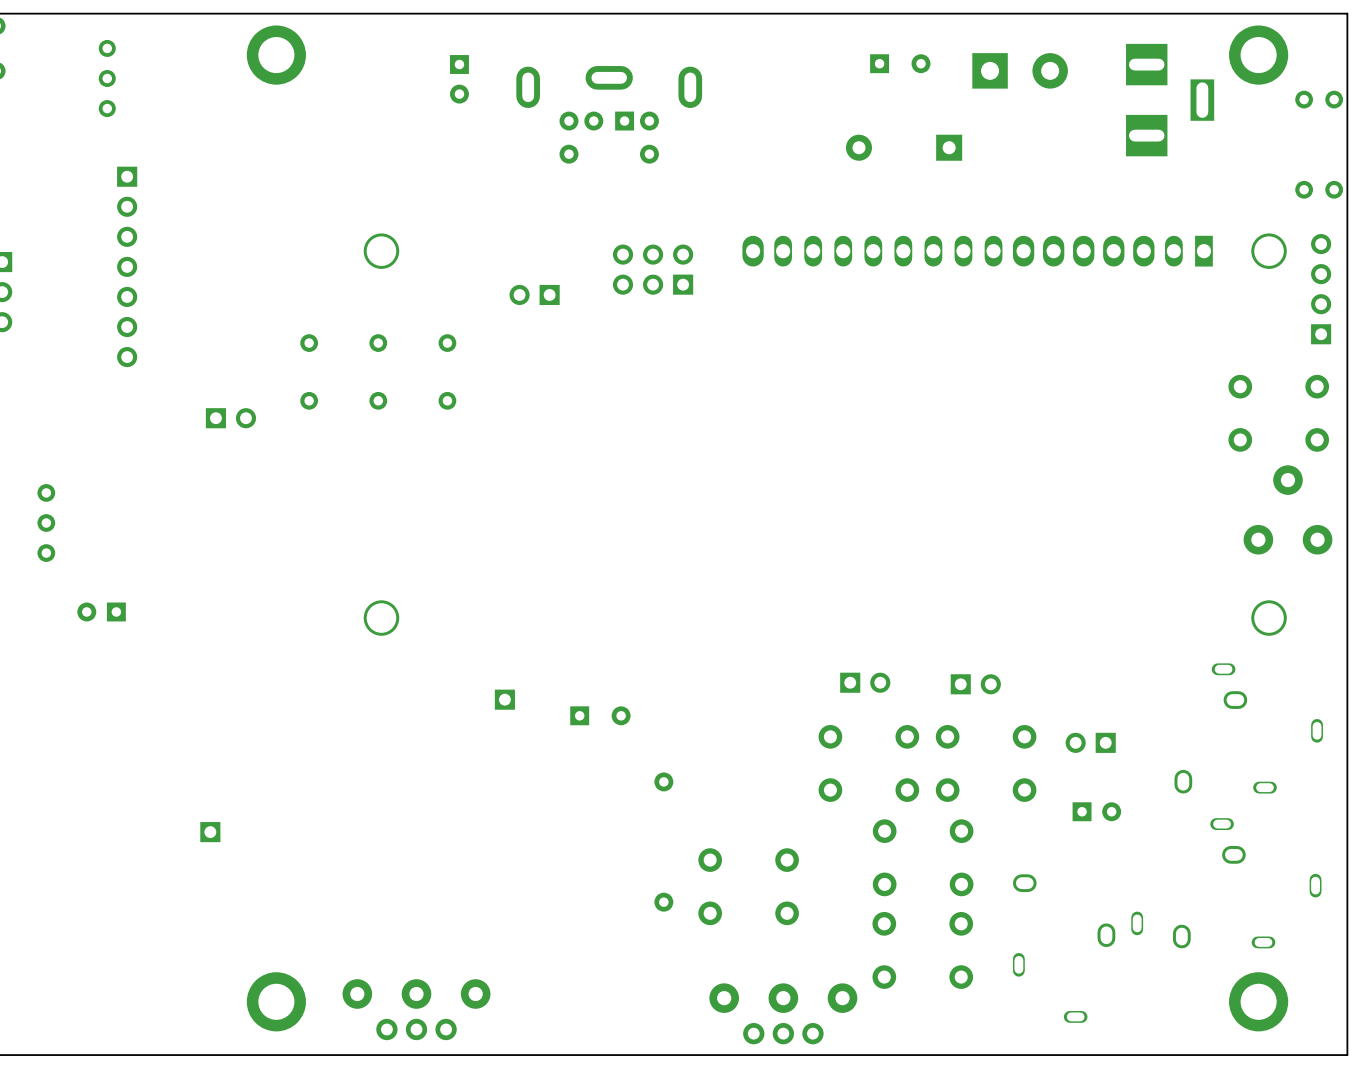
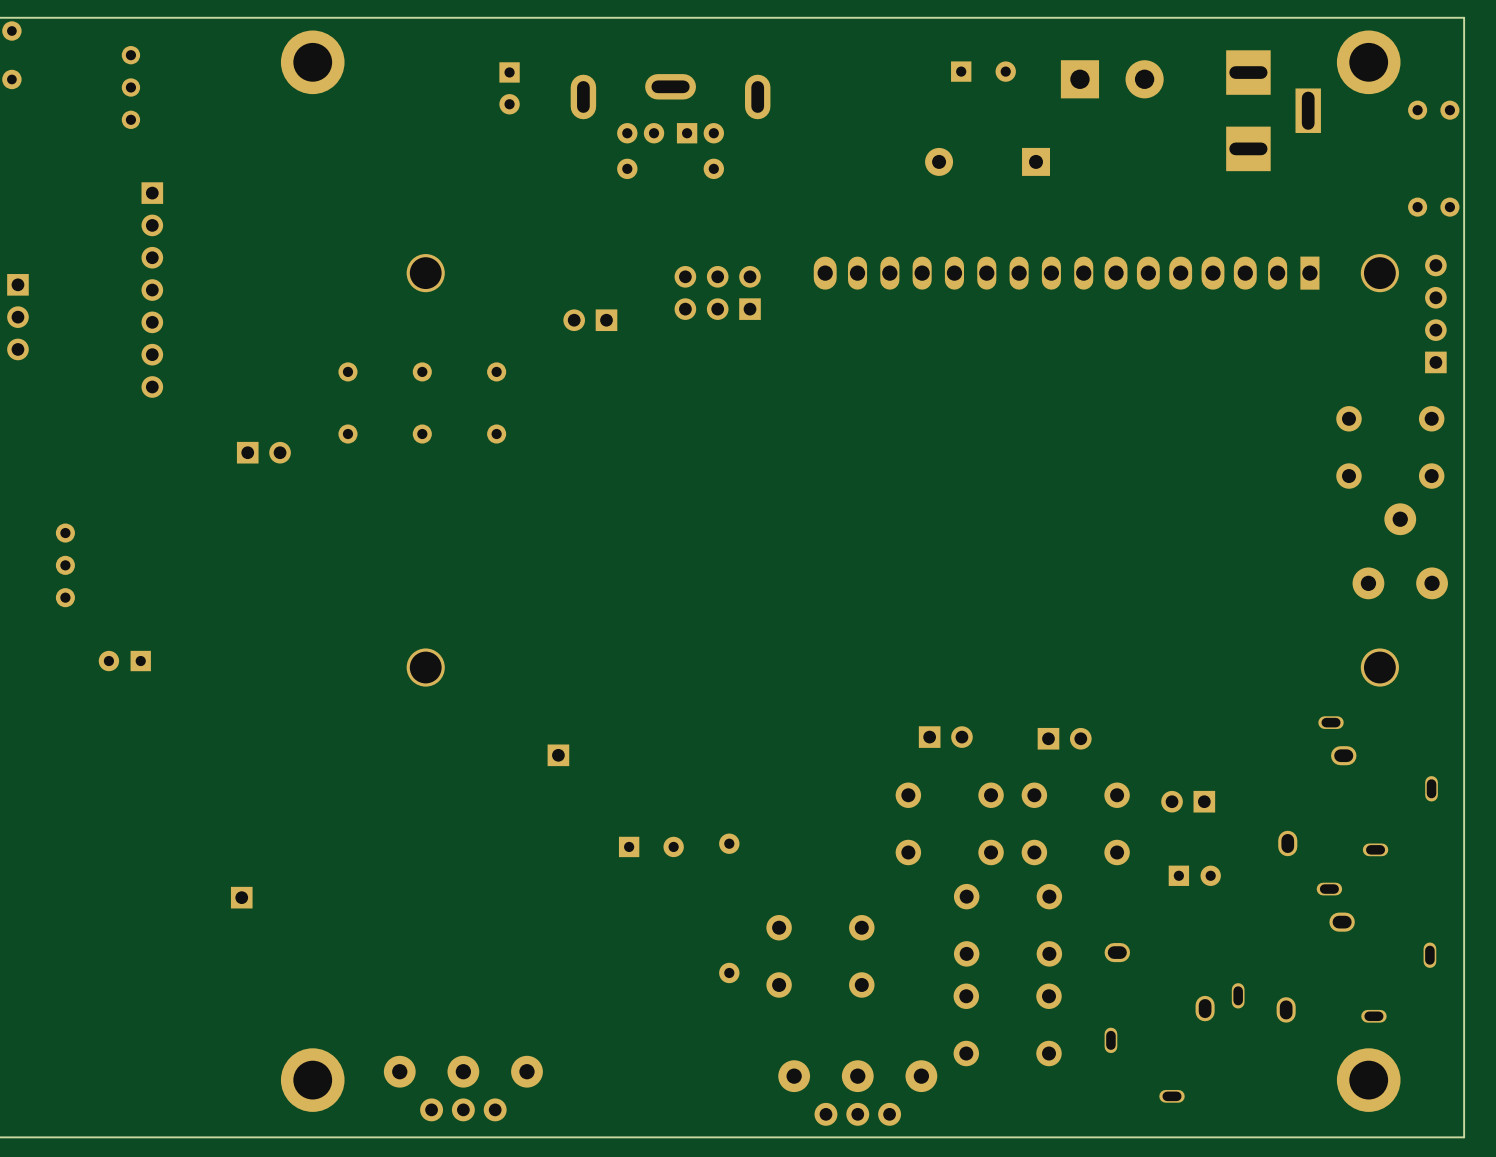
part position: (600, 715) -> (651, 846)

